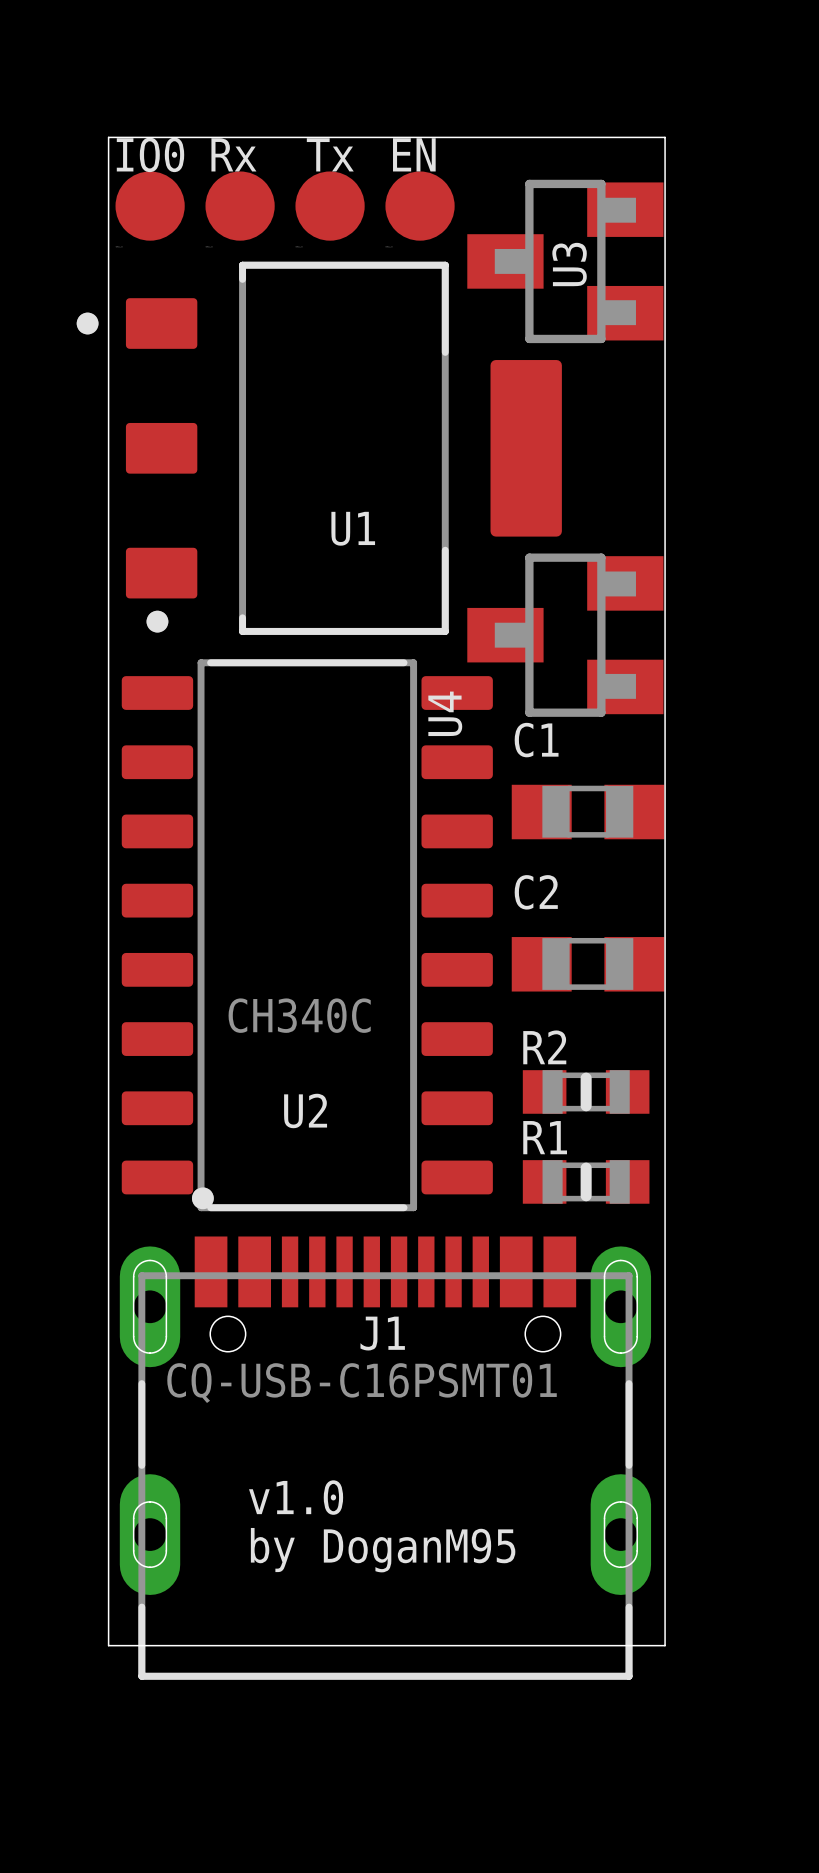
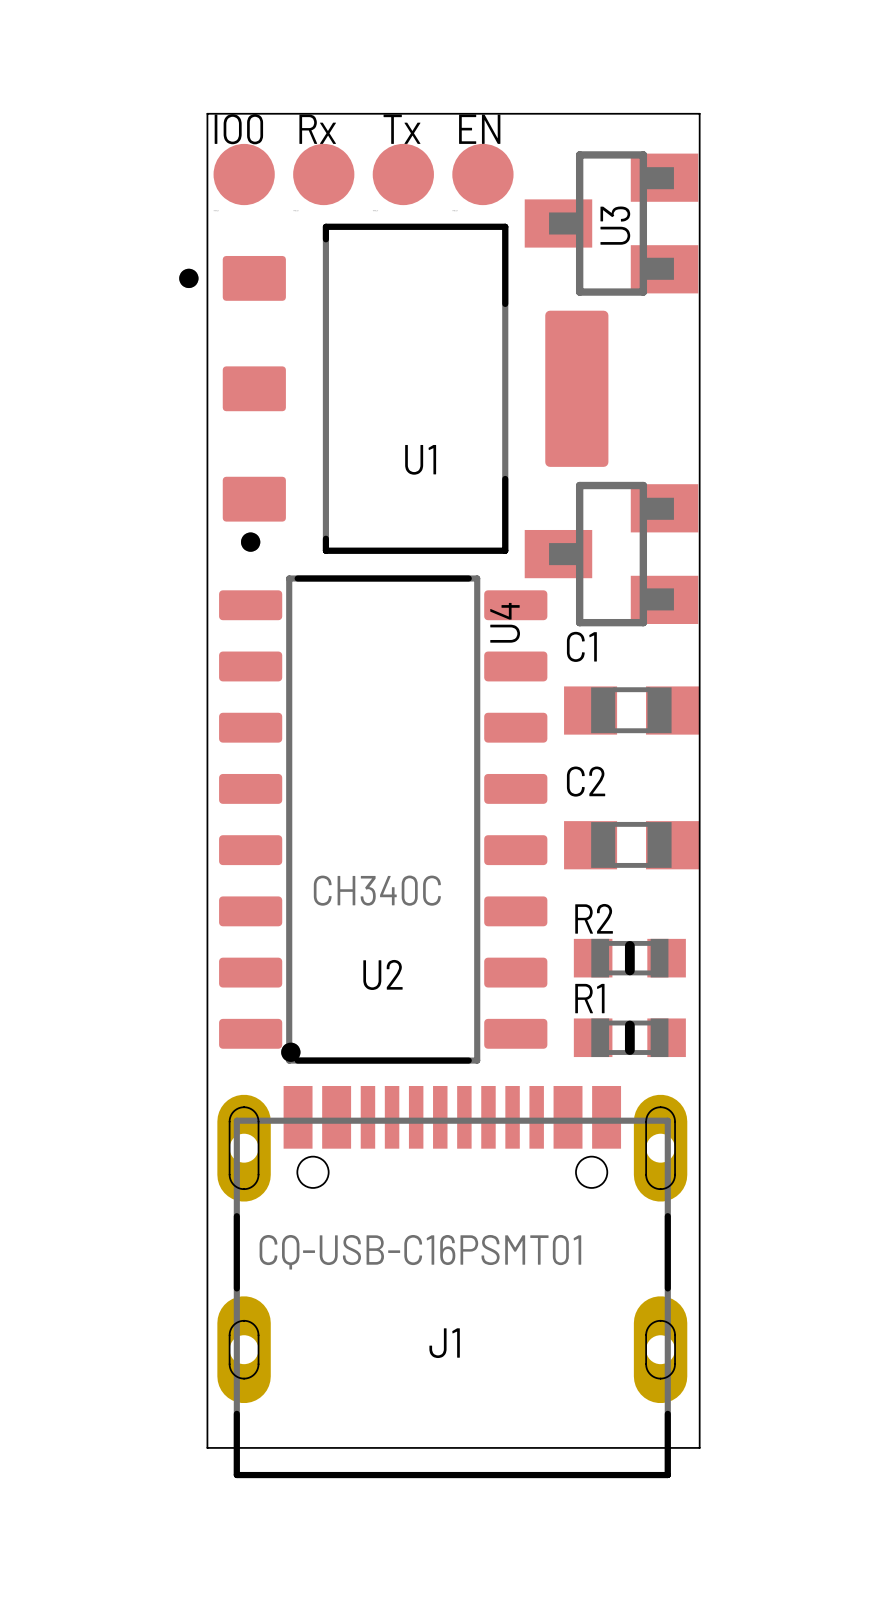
J1 name position: J1 (382, 1333) -> J1 (444, 1343)
J1 value position: CQ-USB-C16PSMT01 (362, 1383) -> CQ-USB-C16PSMT01 (420, 1252)
text: v1.0 (296, 1497) -> none
text: by DoganM95 (383, 1550) -> none

